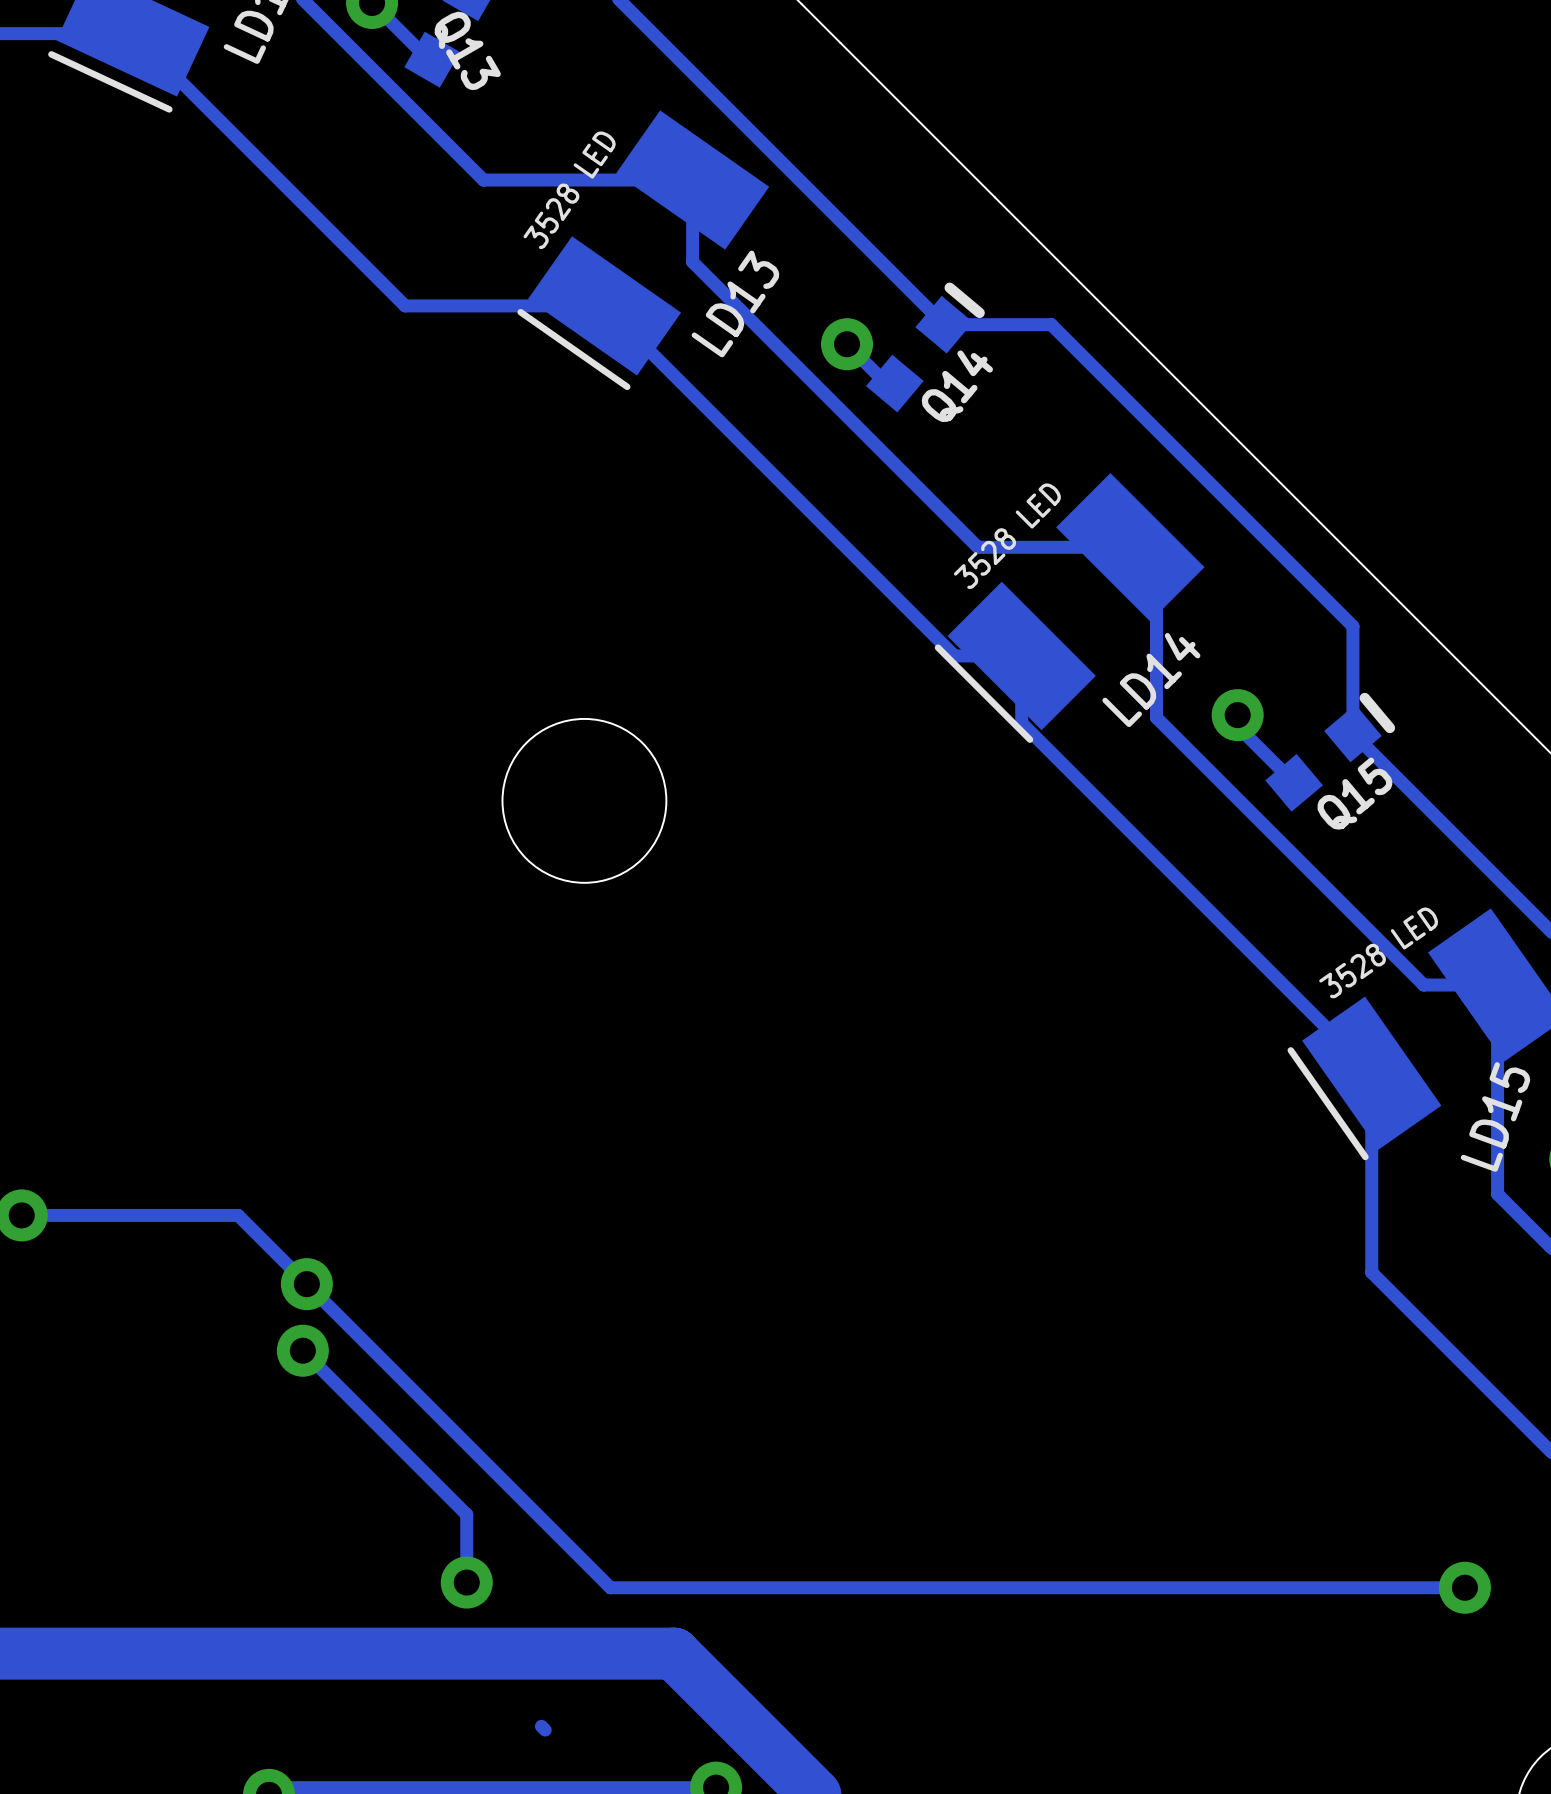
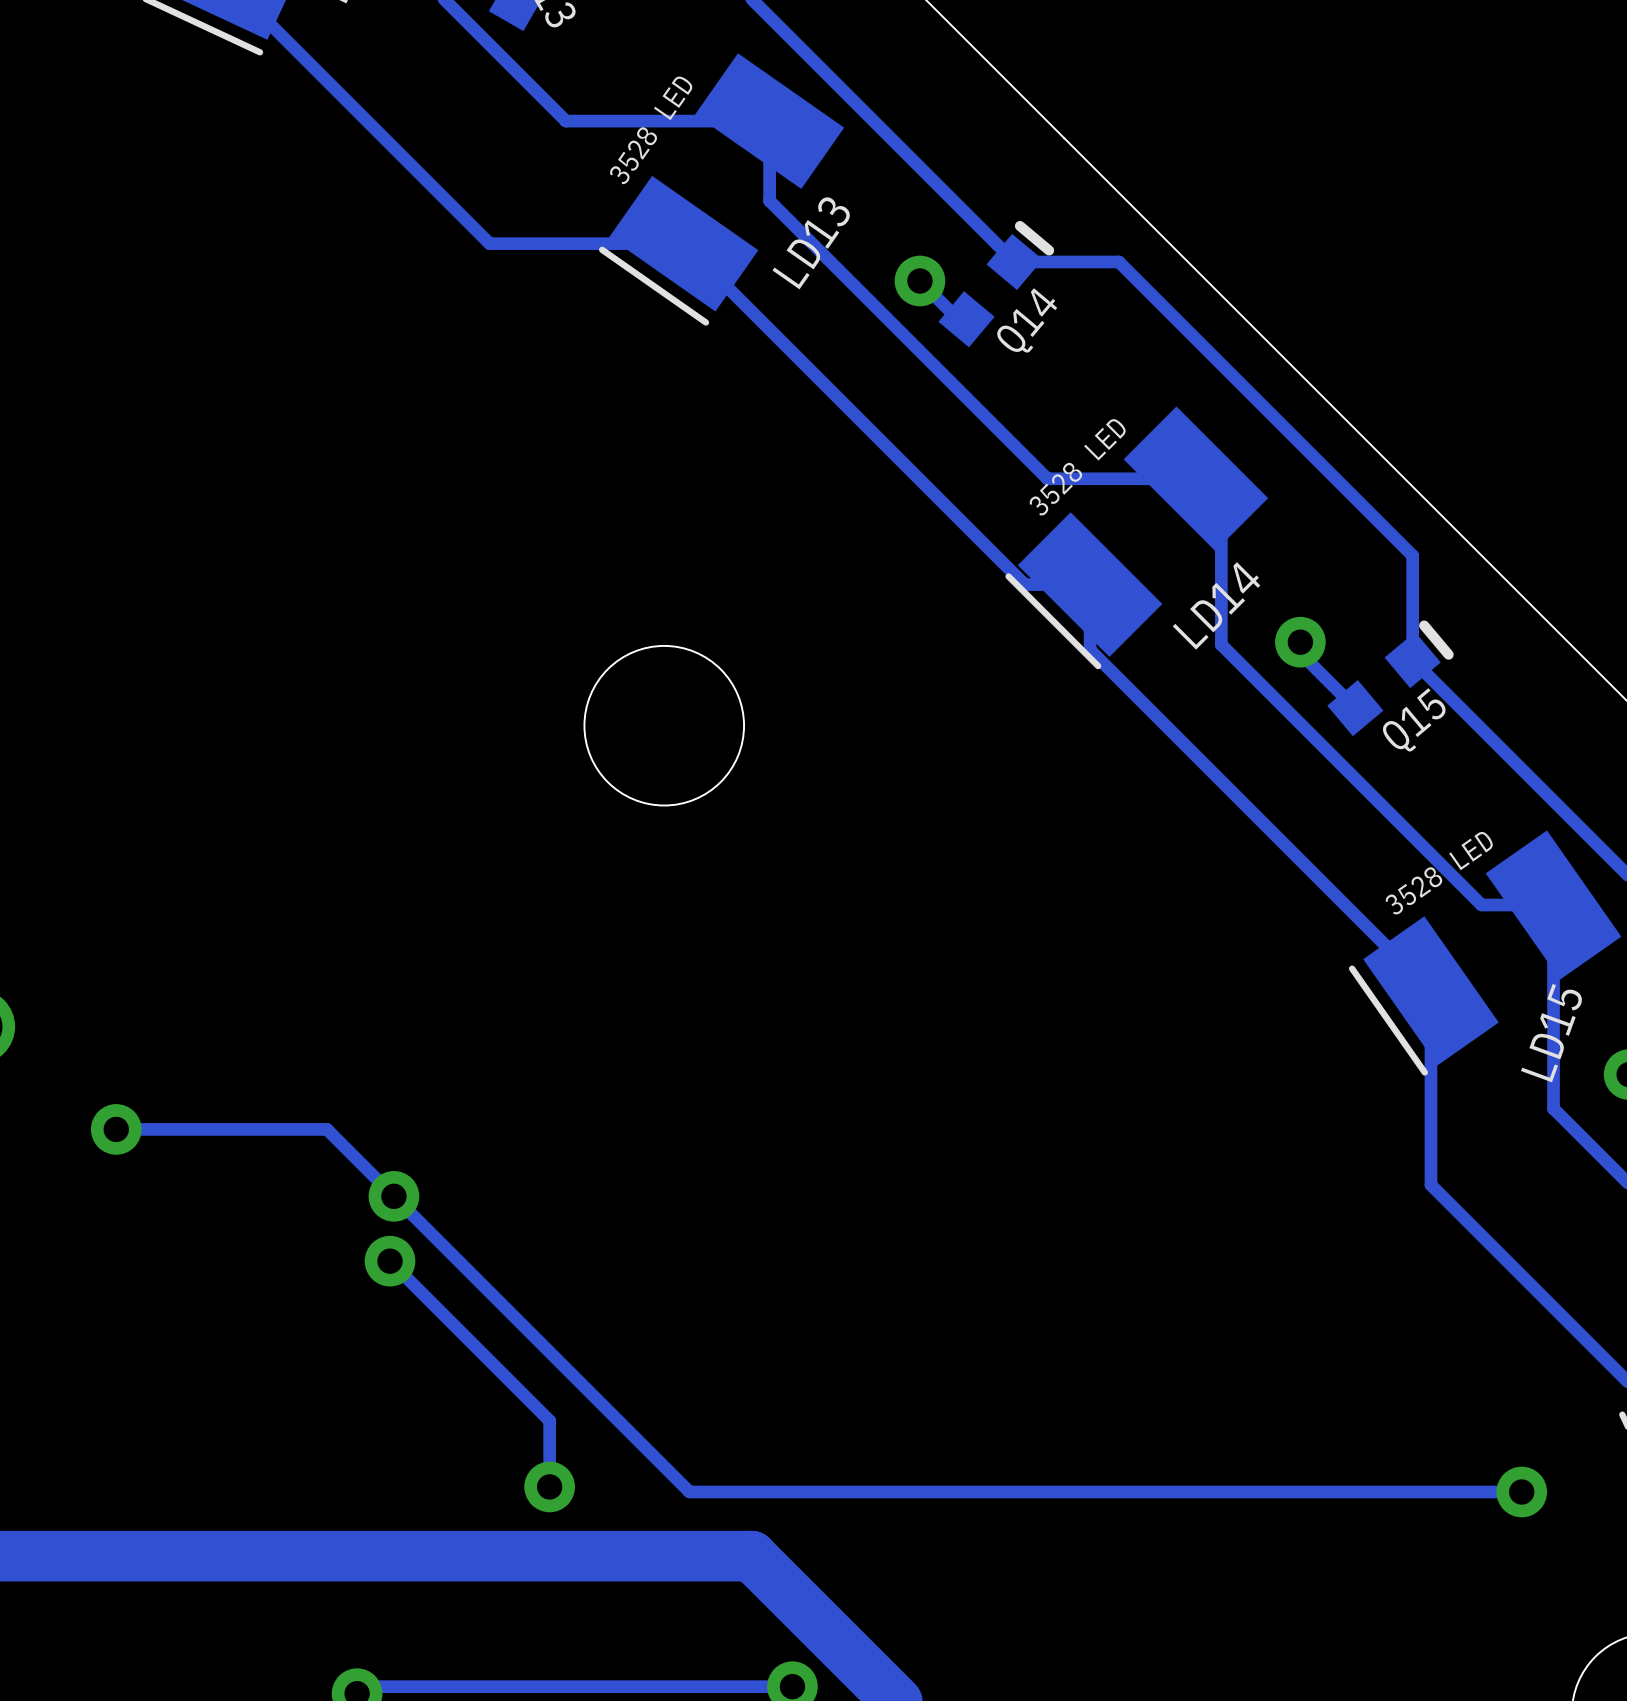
track: (541, 1726) (545, 1730) -> none

